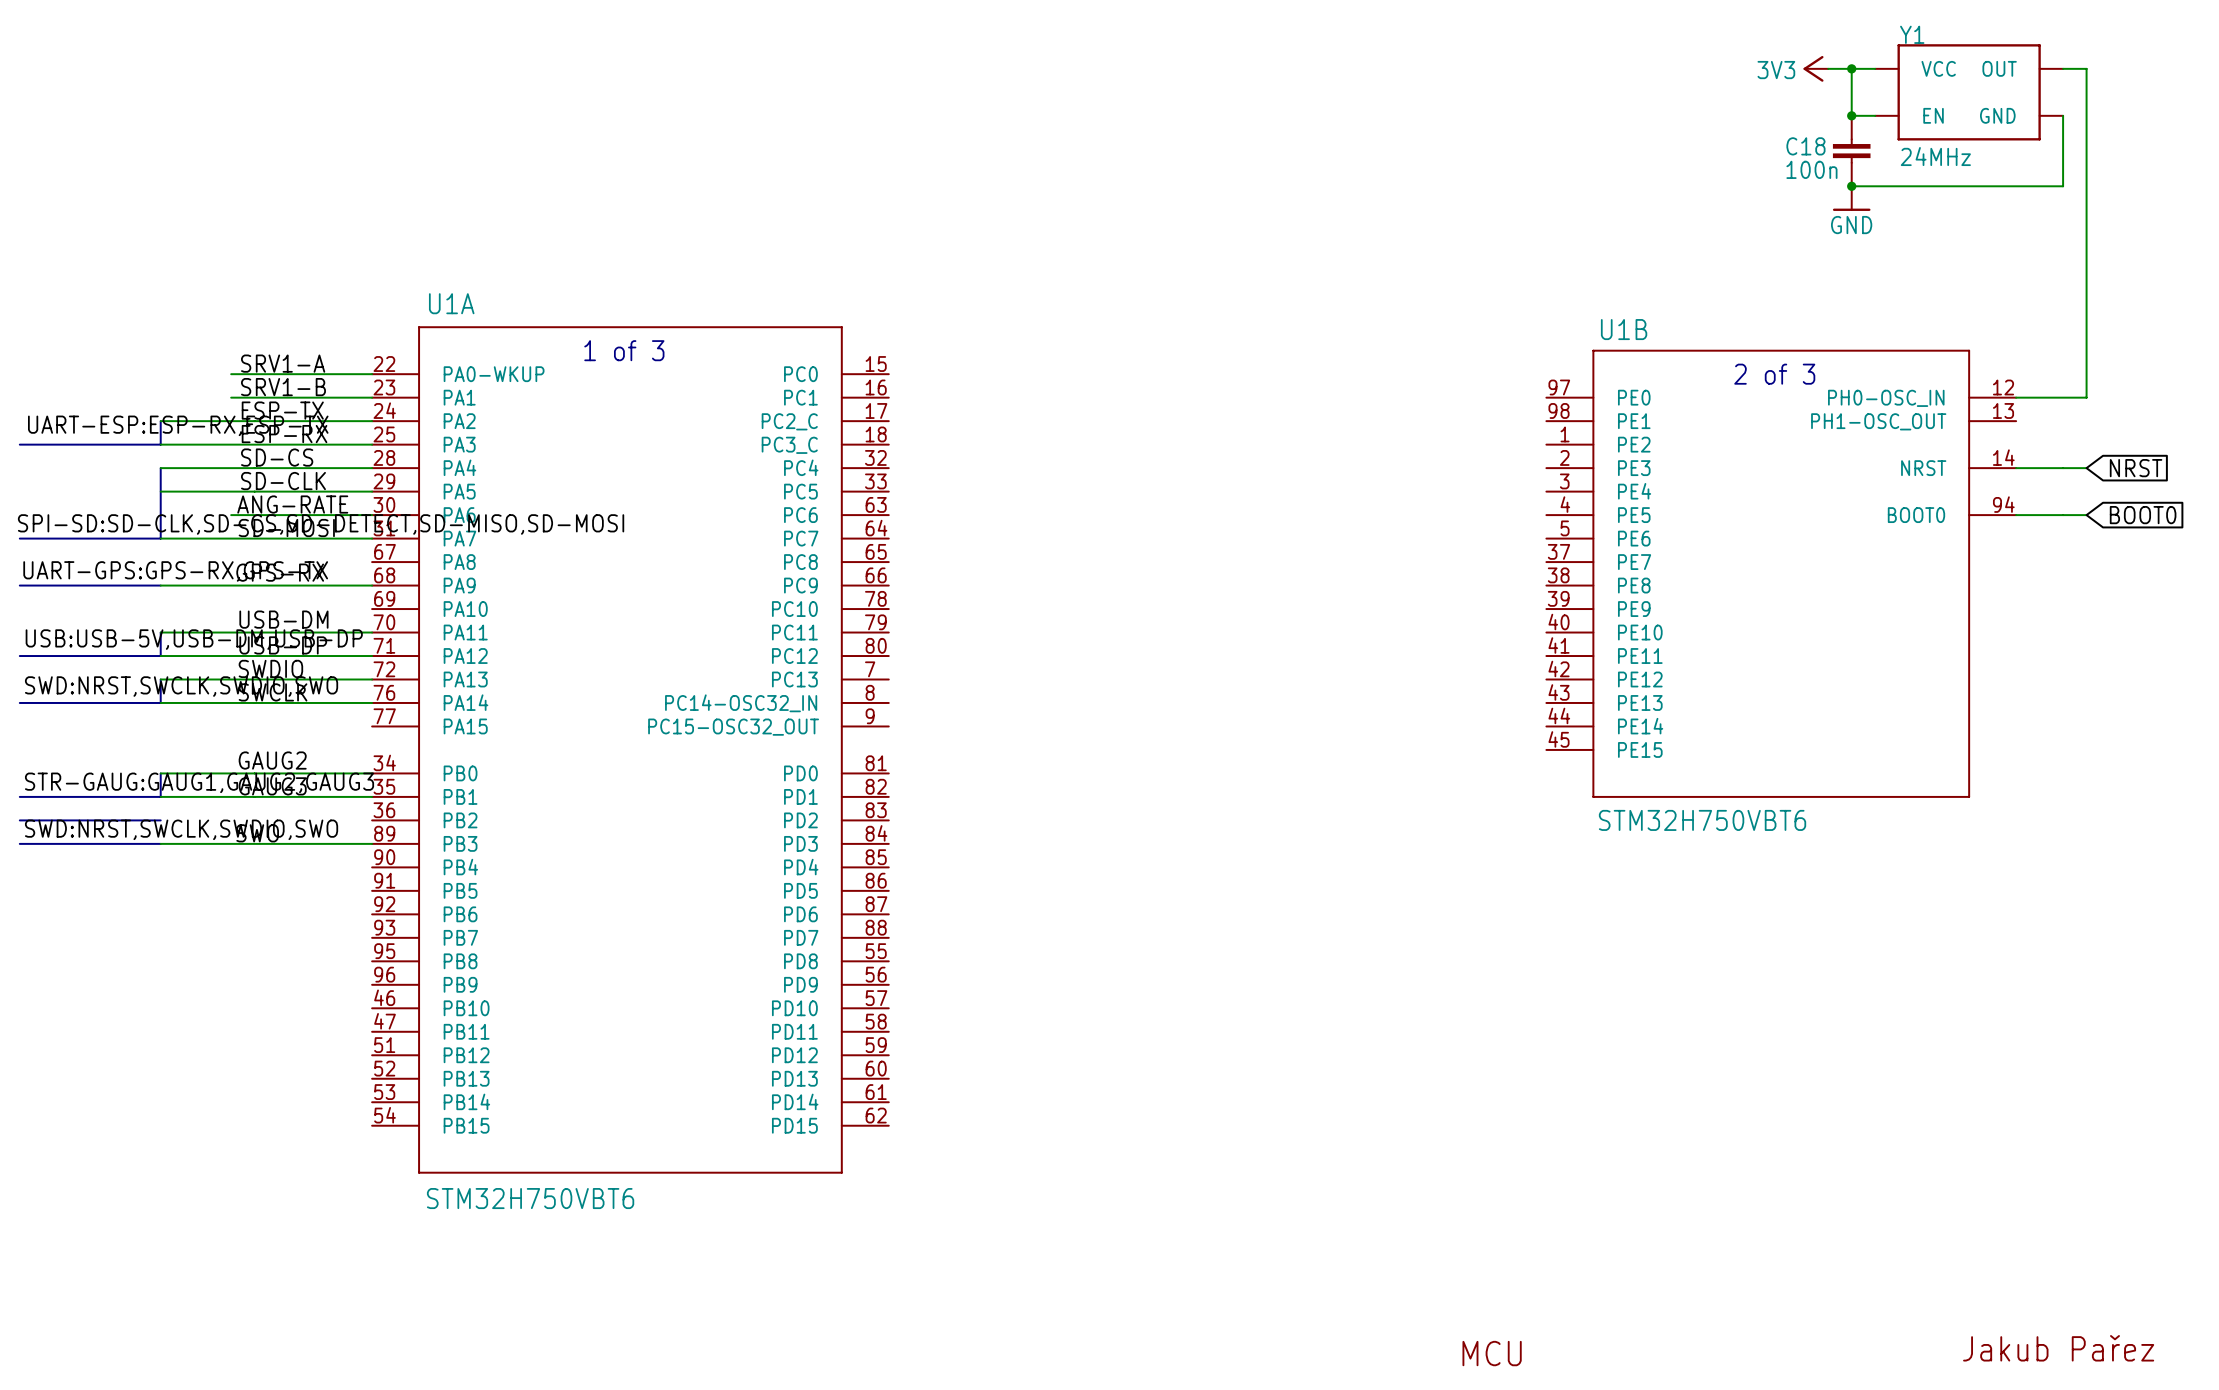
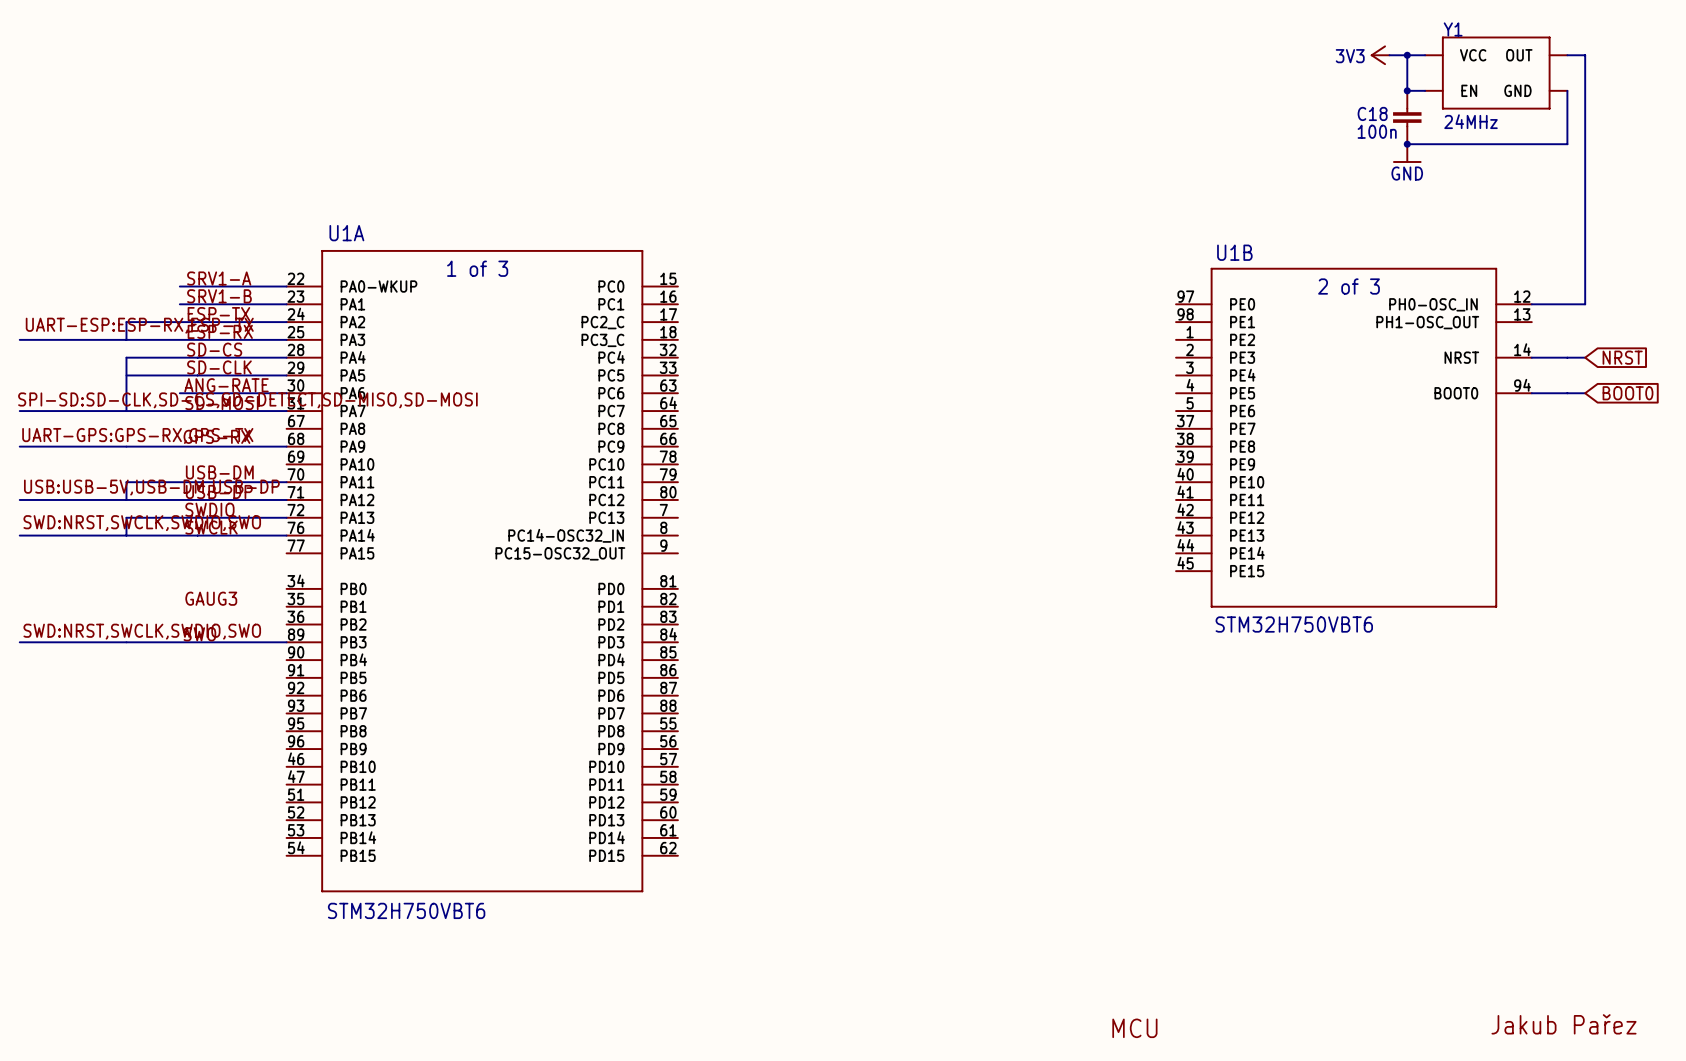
label: GAUG2 (272, 760) -> none
bus: (160, 773) (160, 796) (19, 796) -> none
wire: (160, 773) (372, 773) -> none
label: STR-GAUG:GAUG1,GAUG2,GAUG3 (199, 782) -> none
wire: (160, 796) (372, 796) -> none
bus: (19, 820) (160, 820) -> none

